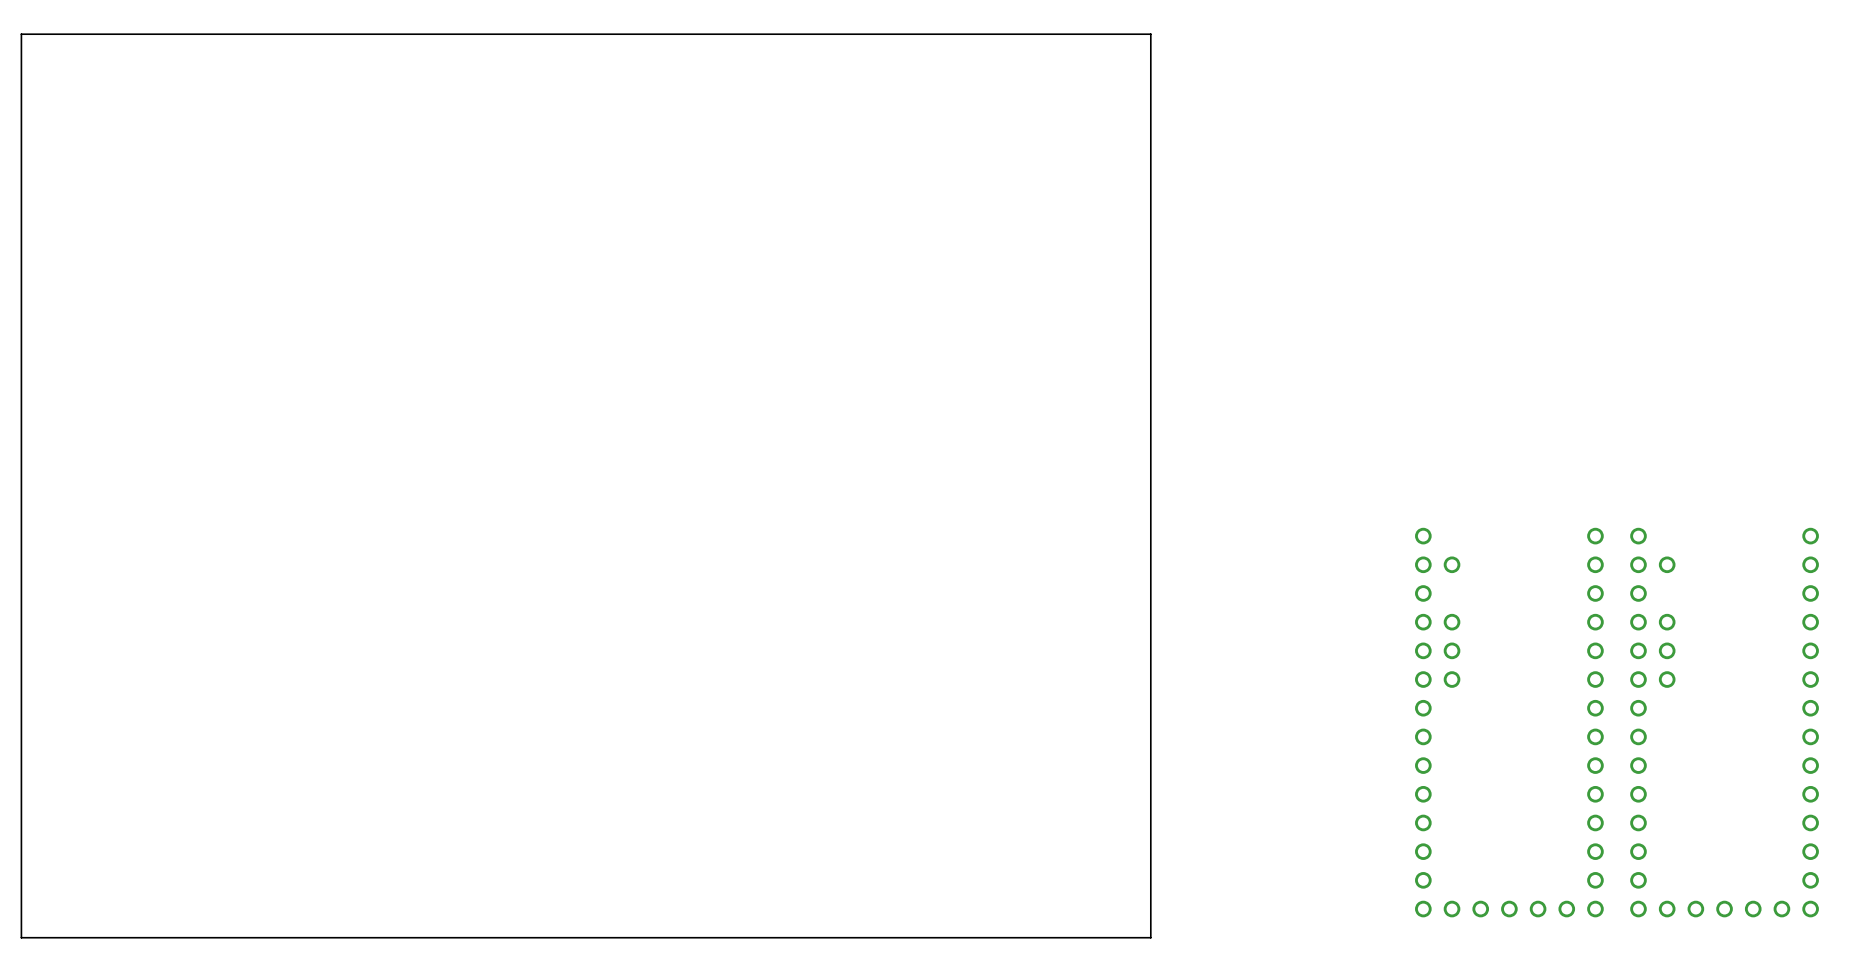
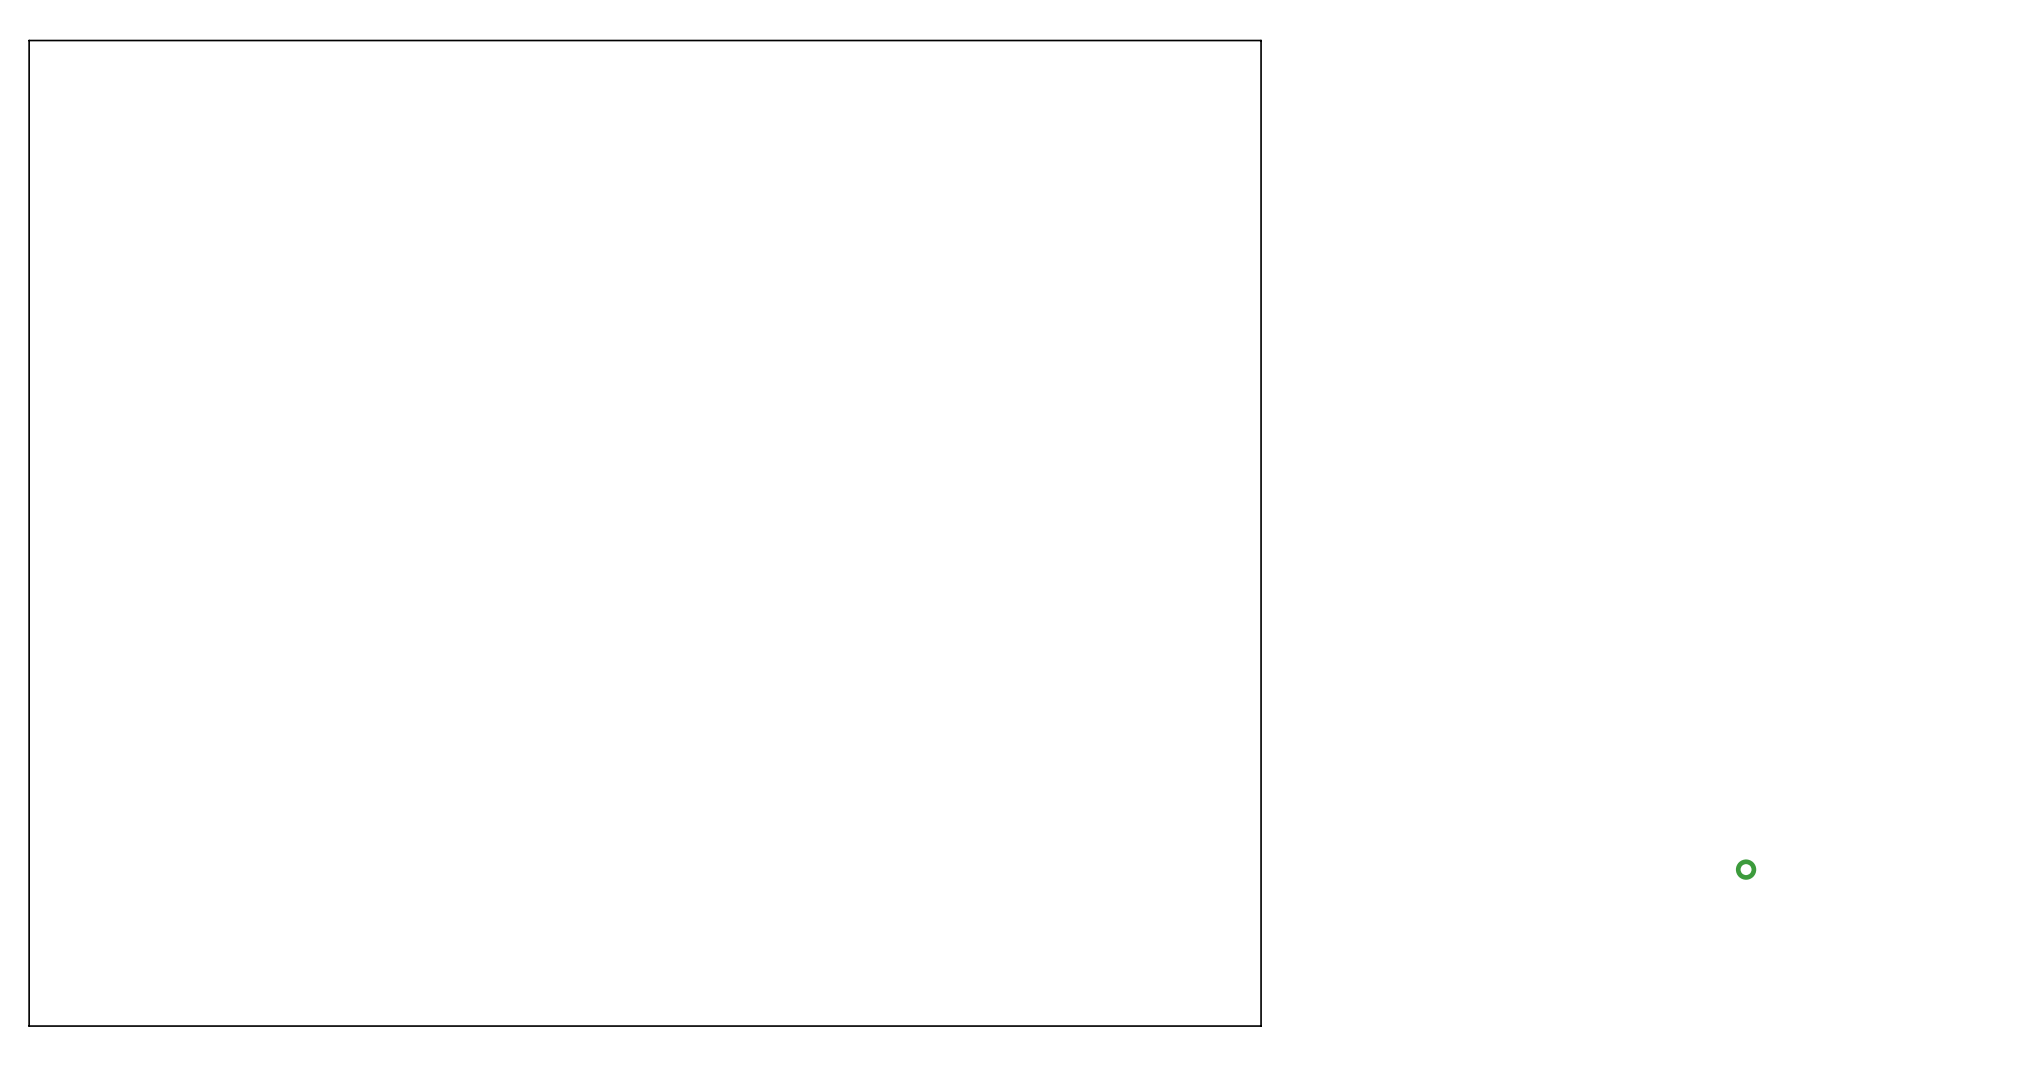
part: (1509, 722) -> none
part: (1724, 722) -> none
part: none -> (1746, 869)

